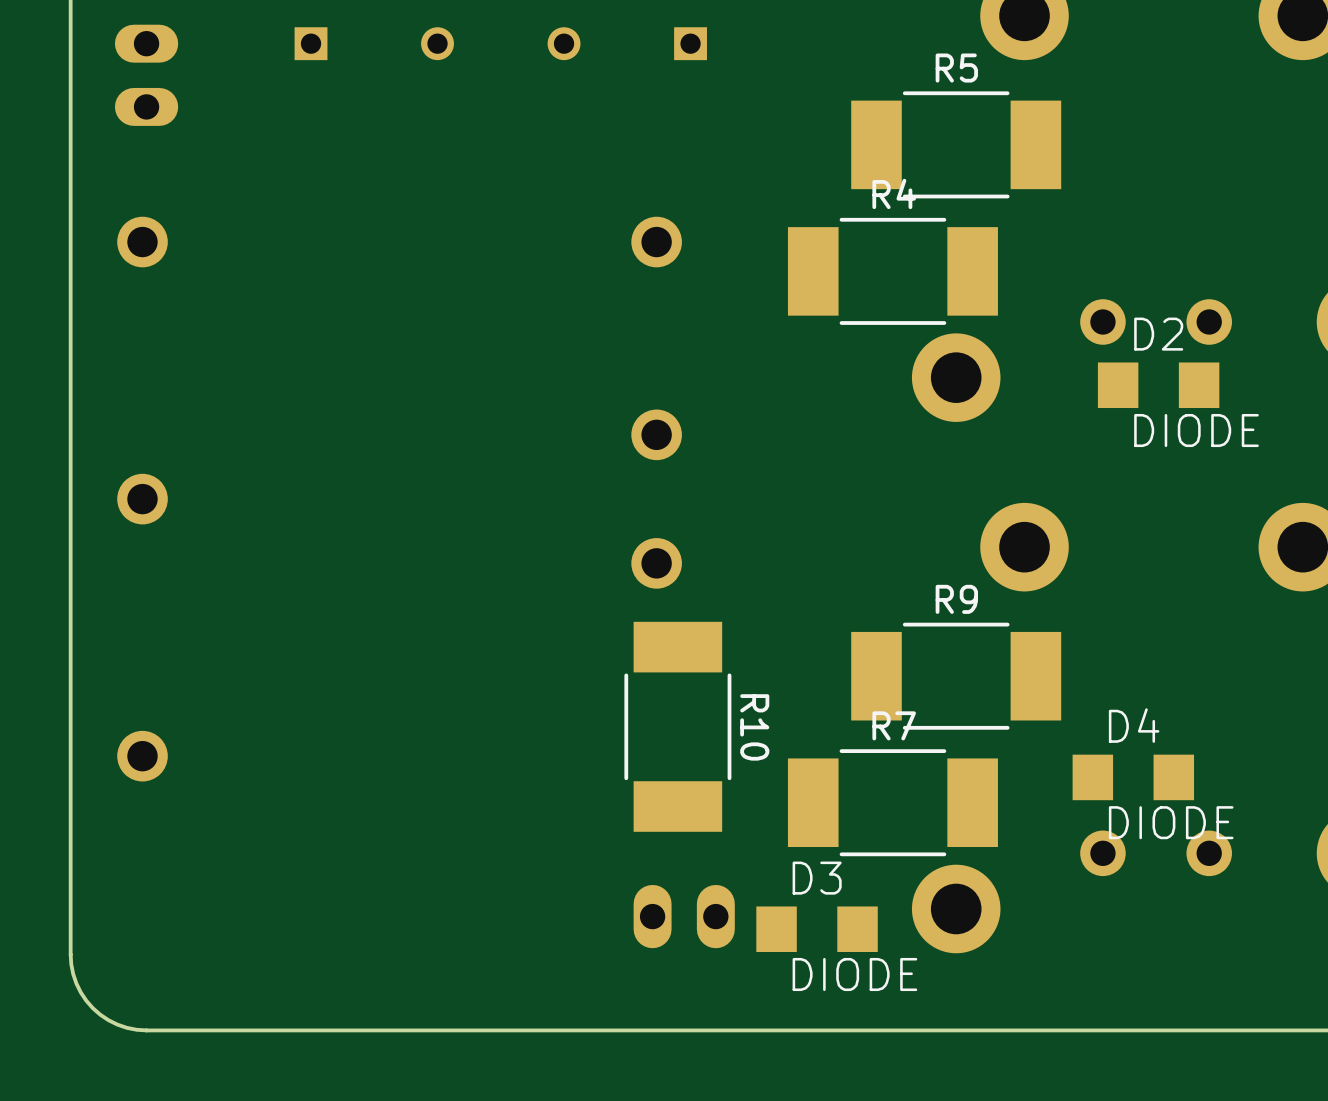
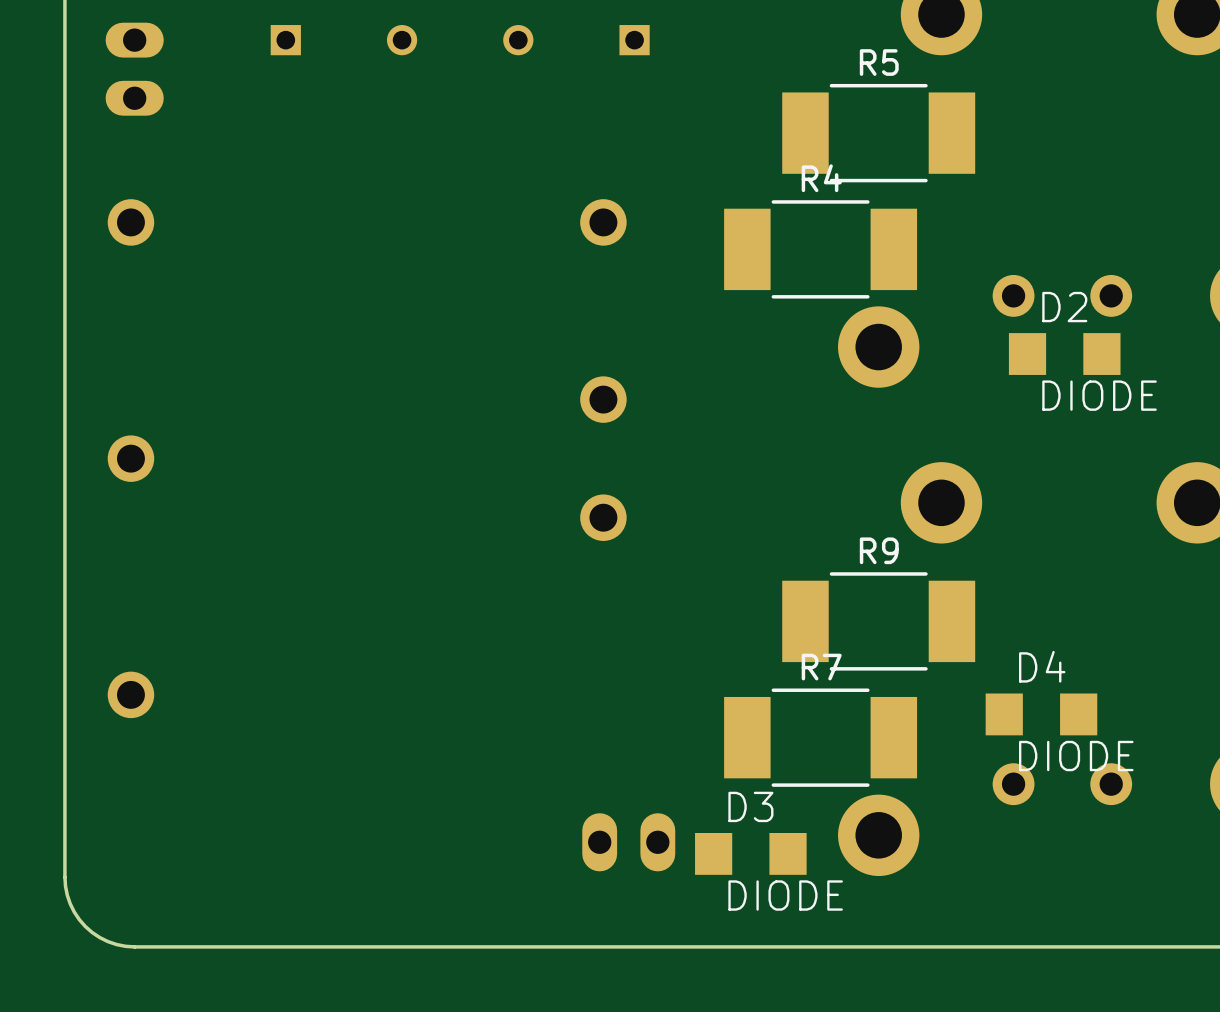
R10: (677, 726) -> none

